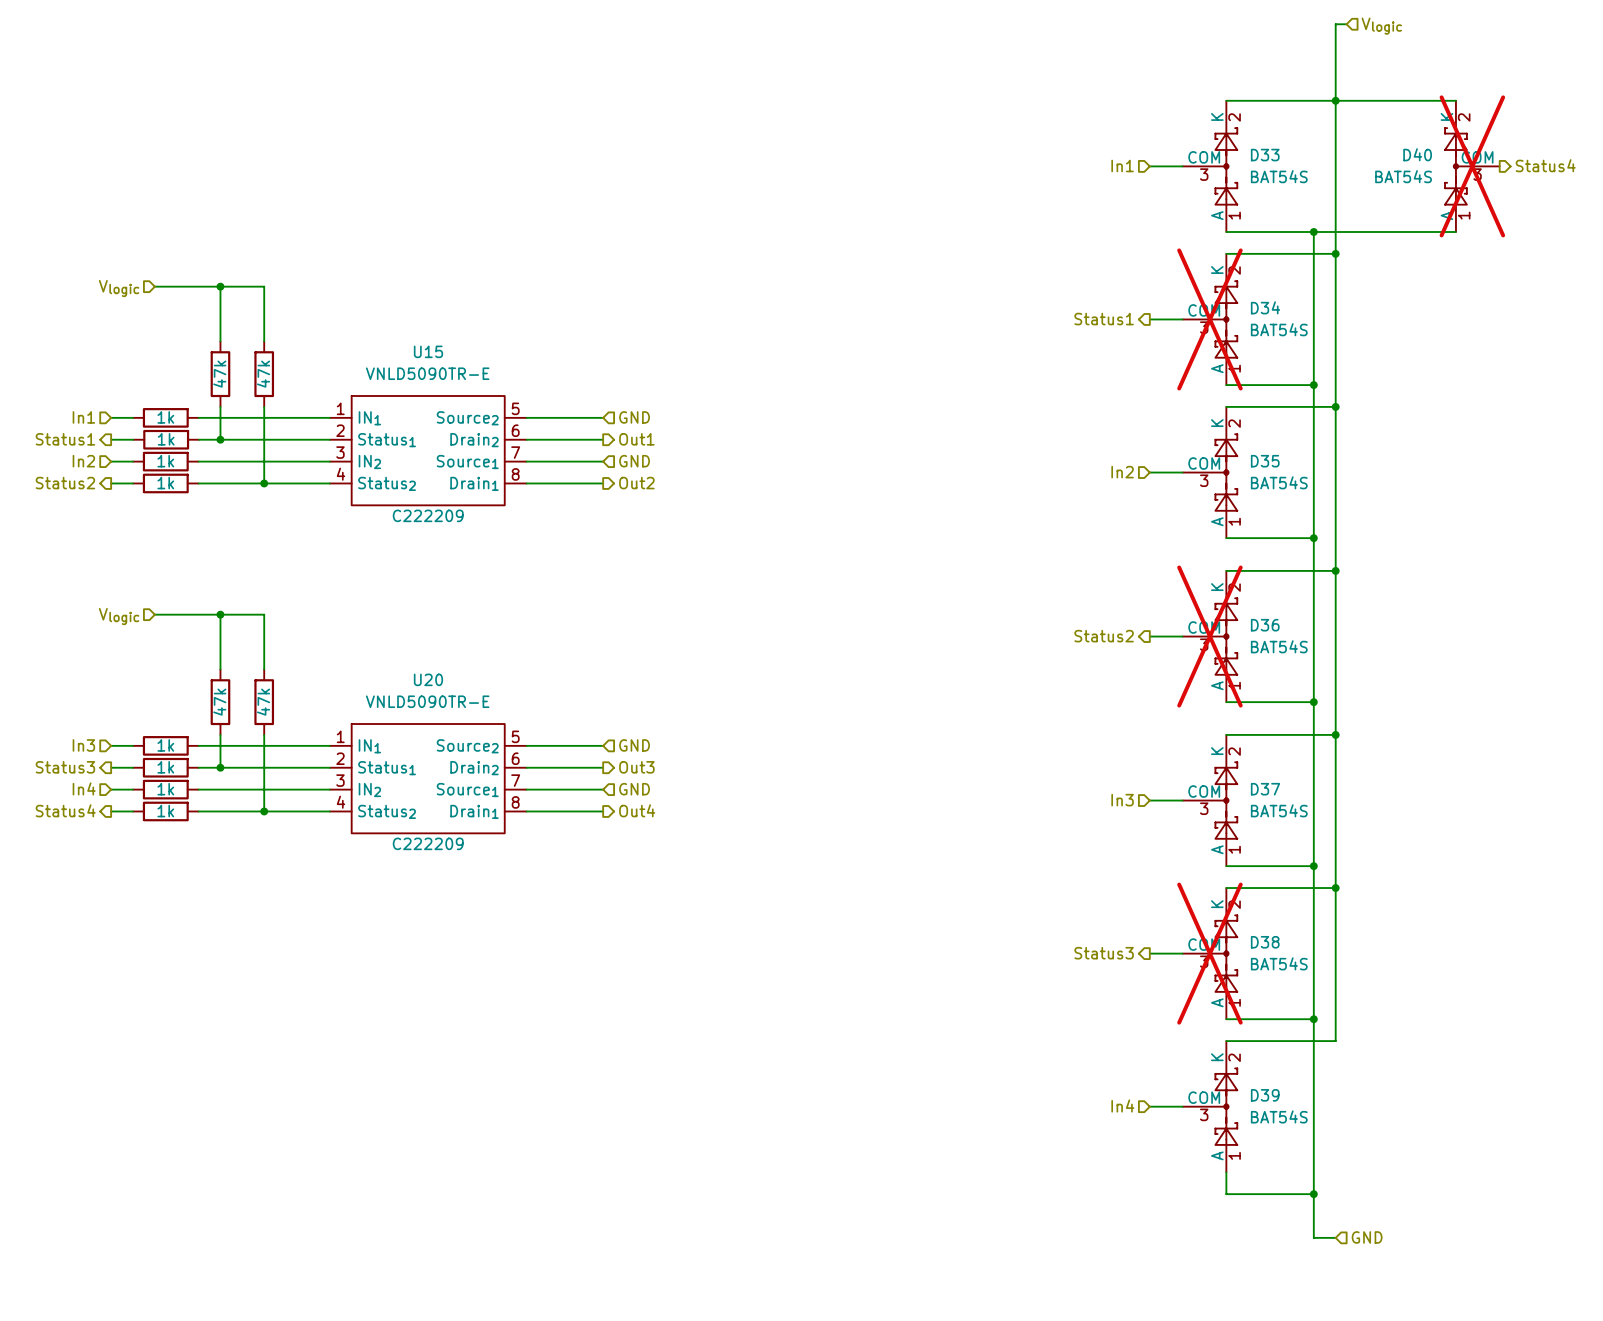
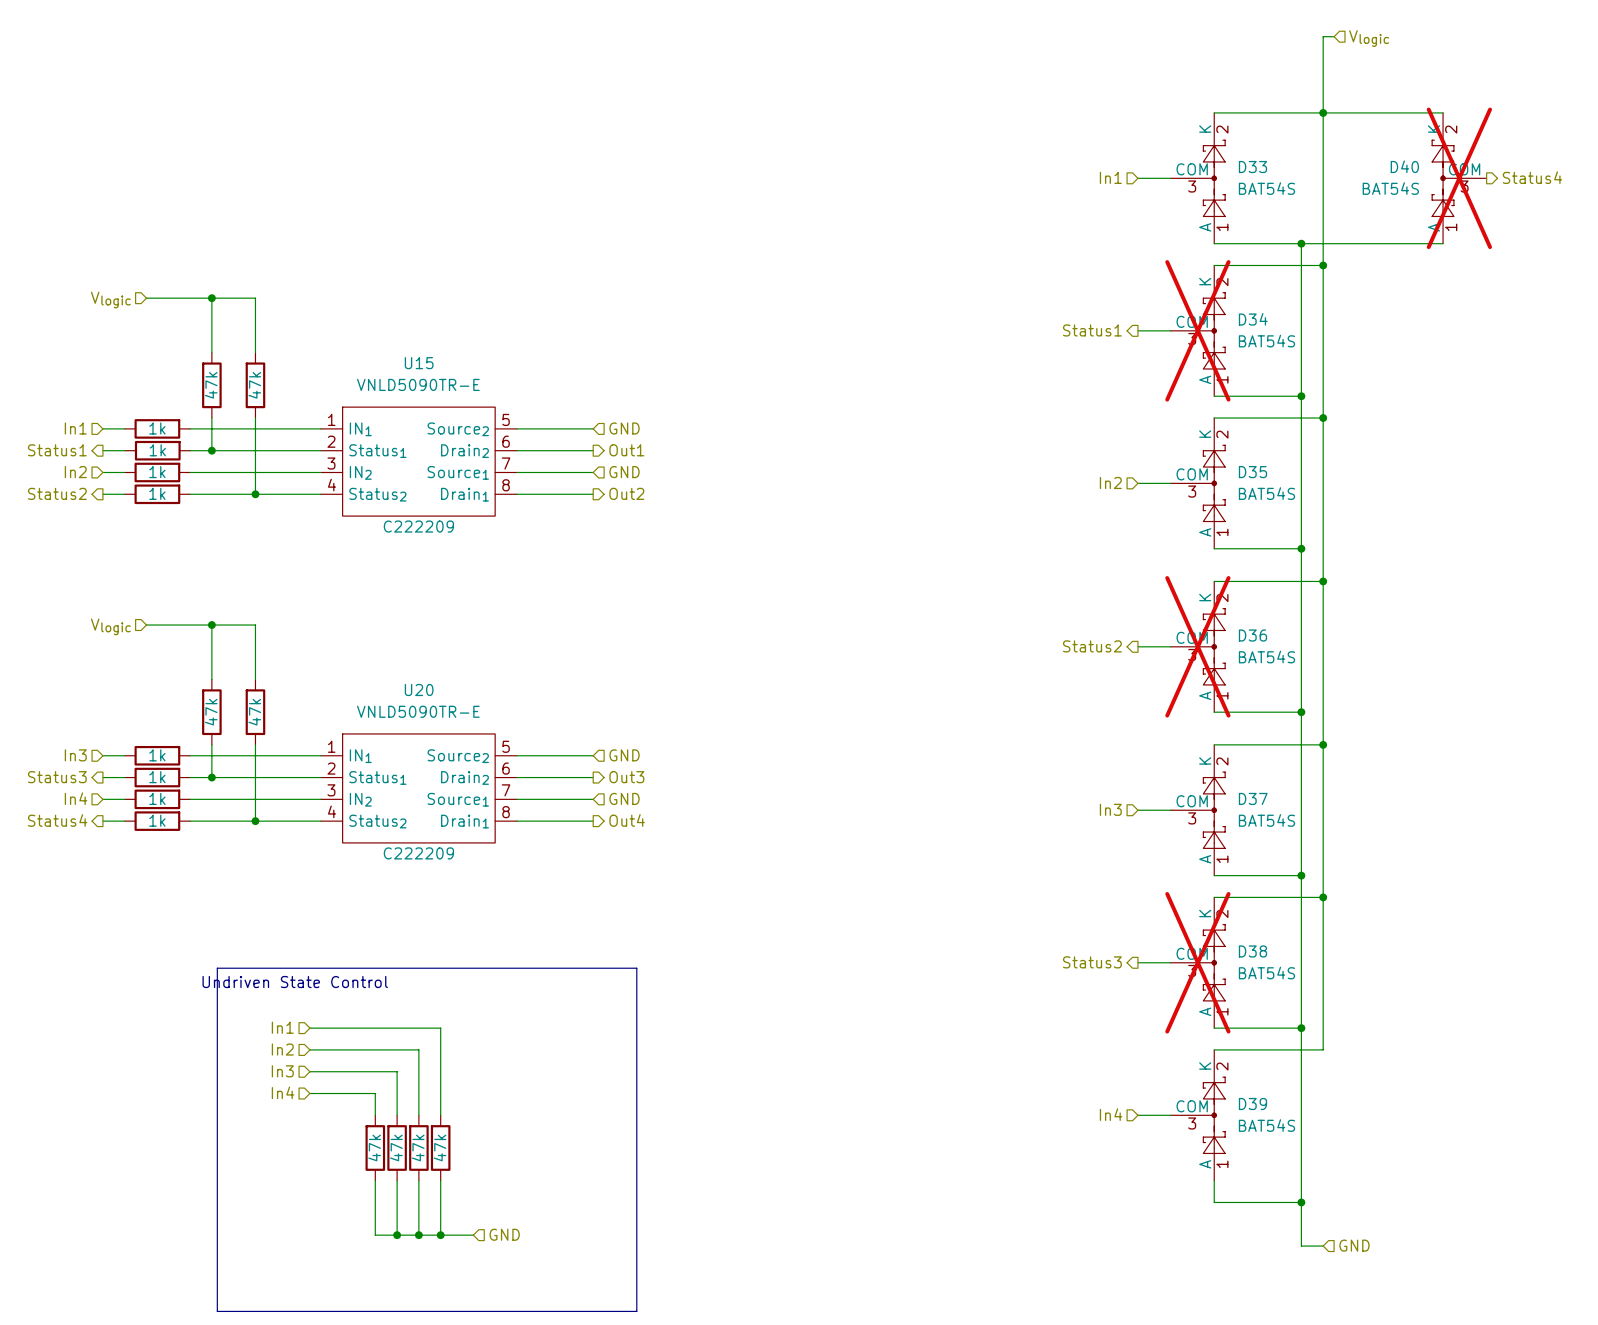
line: none -> (217, 968) (636, 968) (636, 1311) (217, 1311) (217, 968)
text: none -> Undriven State Control (295, 982)
hierarchical label: none -> In1 (282, 1027)
wire: none -> (309, 1028) (440, 1028) (440, 1115)
hierarchical label: none -> In2 (282, 1049)
wire: none -> (309, 1049) (418, 1049) (418, 1115)
hierarchical label: none -> In3 (282, 1071)
wire: none -> (309, 1071) (397, 1071) (397, 1115)
hierarchical label: none -> In4 (283, 1092)
wire: none -> (309, 1093) (375, 1093) (375, 1115)
part: none -> 47k (375, 1147)
part: none -> 47k (397, 1147)
part: none -> 47k (418, 1147)
part: none -> 47k (440, 1147)
wire: none -> (375, 1180) (375, 1235) (473, 1235)
wire: none -> (397, 1180) (397, 1235)
wire: none -> (418, 1180) (418, 1235)
wire: none -> (440, 1180) (440, 1235)
junction: none -> (397, 1235)
junction: none -> (418, 1235)
junction: none -> (440, 1235)
hierarchical label: none -> GND (504, 1234)

